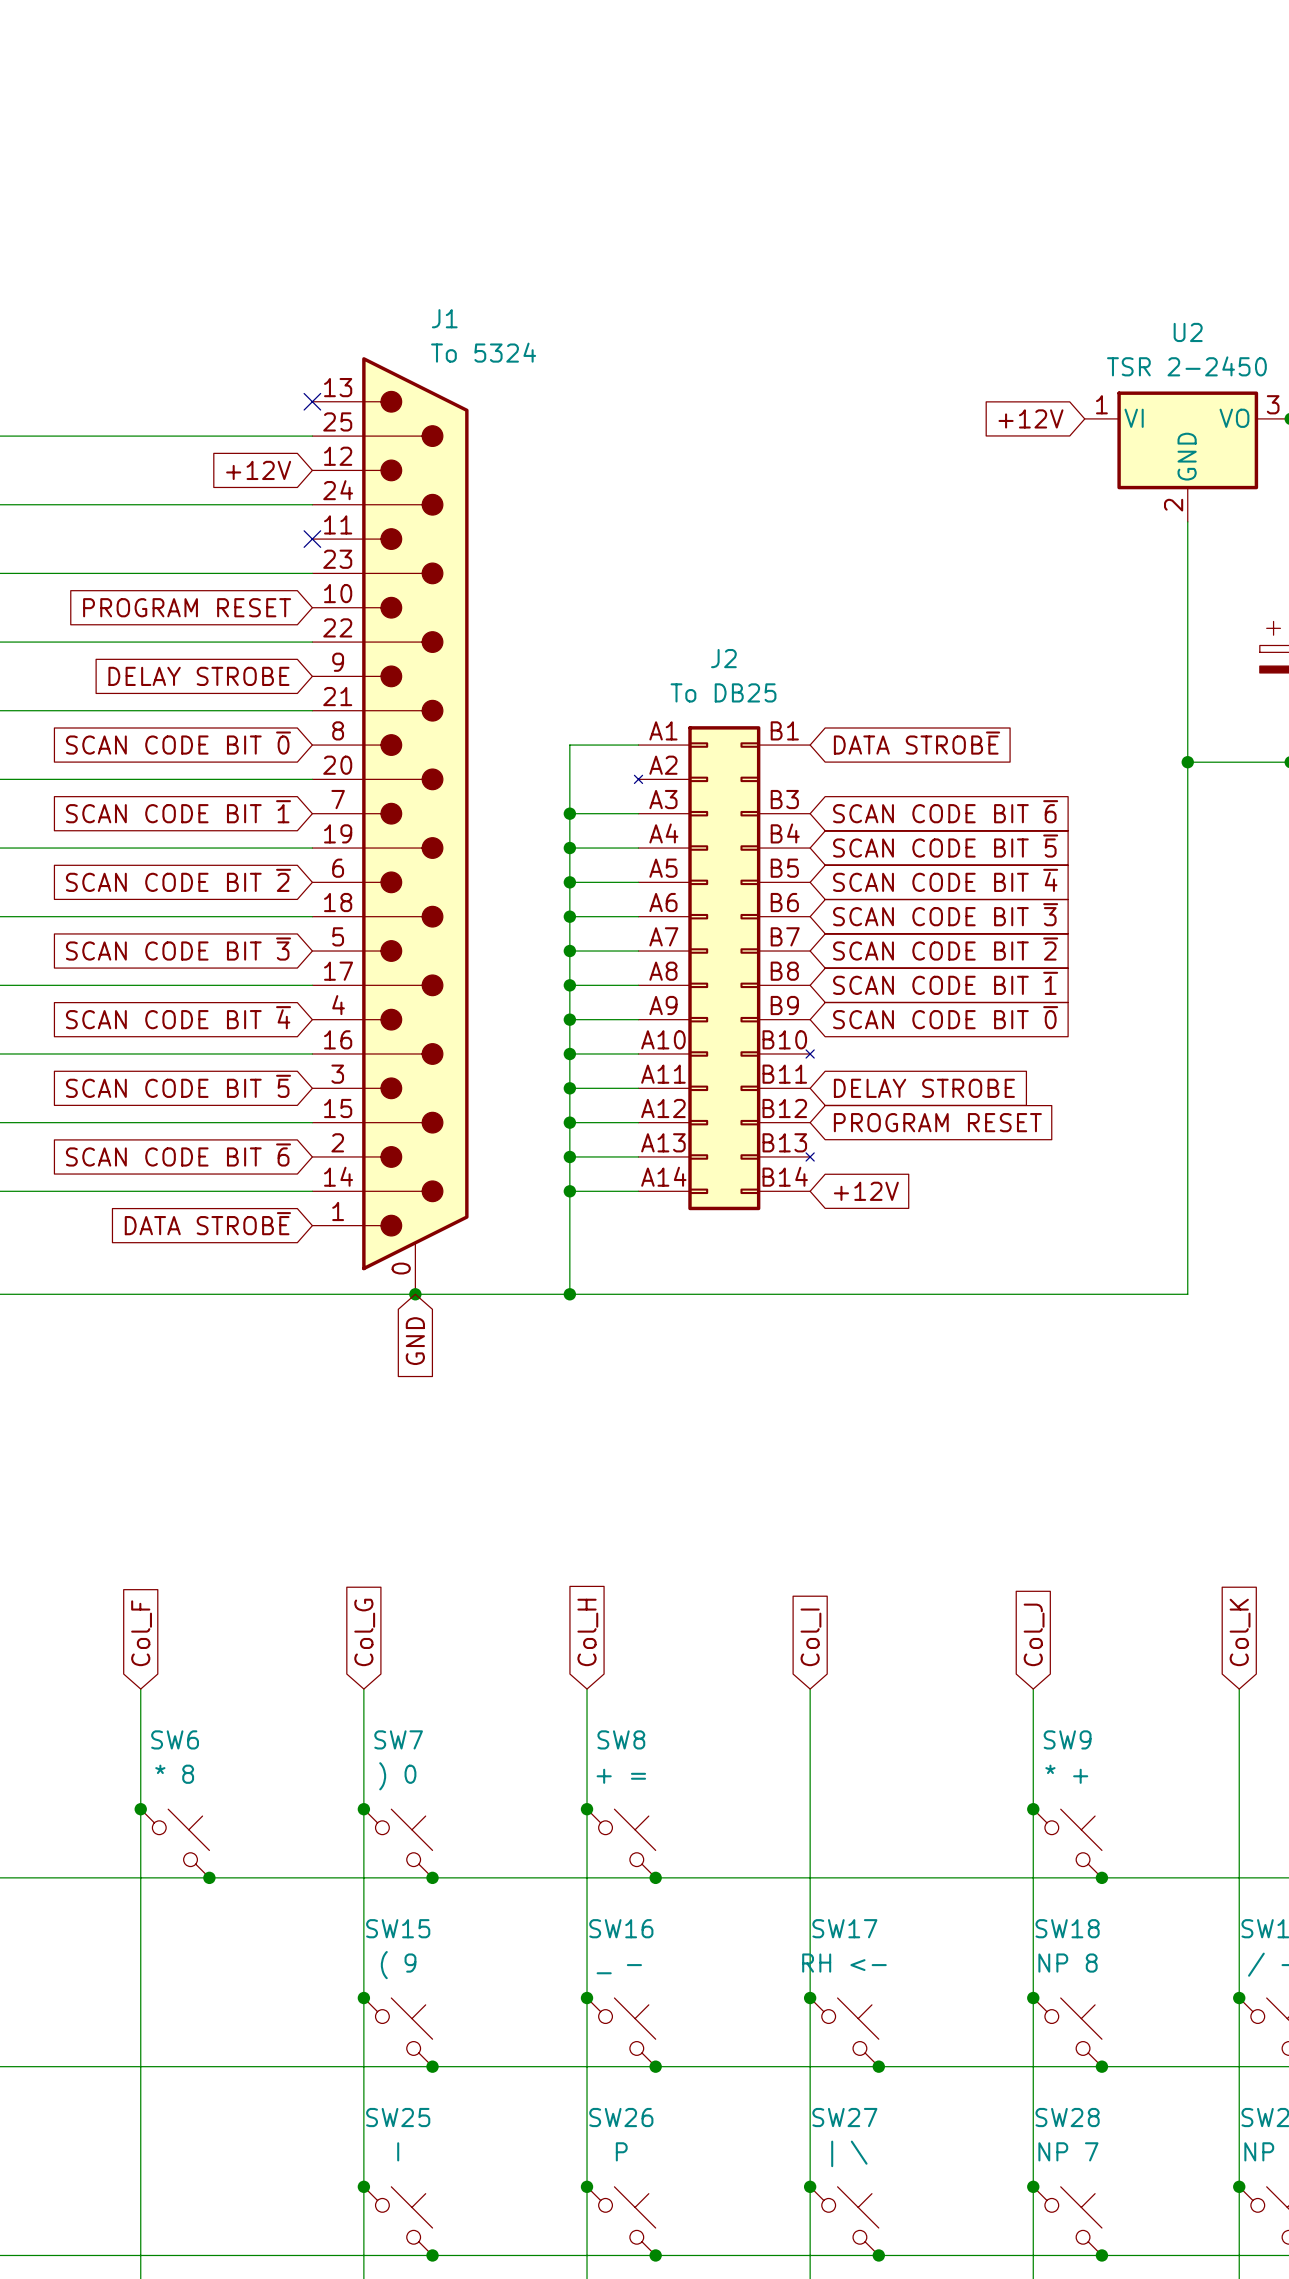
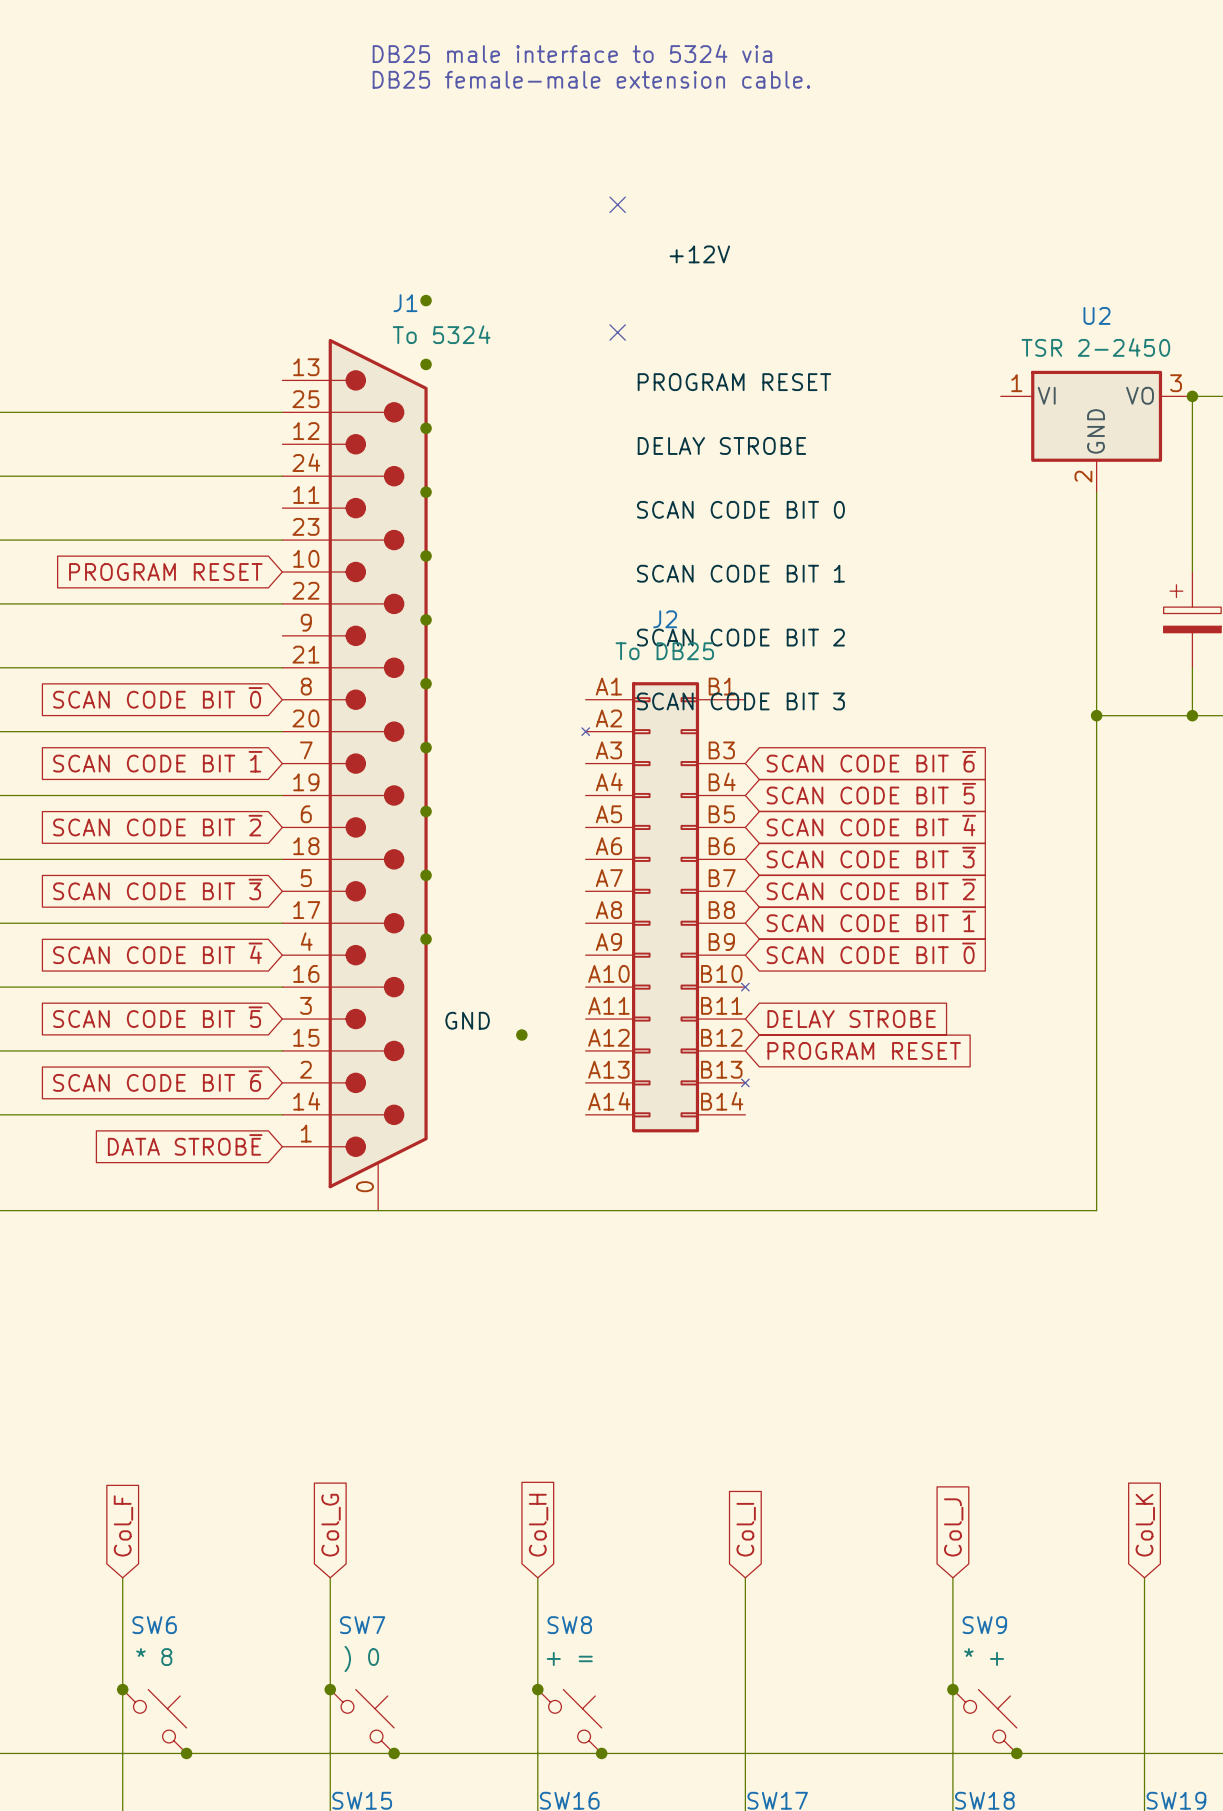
text: none -> DB25 male interface to 5324 via (572, 53)
text: none -> DB25 female-male extension cable. (591, 79)
no-connect mark: none -> (617, 204)
label: none -> +12V (699, 254)
junction: none -> (426, 300)
no-connect mark: none -> (617, 332)
junction: none -> (426, 364)
no-connect mark: (312, 401) -> none
label: none -> PROGRAM RESET (734, 382)
global label: +12V (1031, 418) -> none
junction: none -> (426, 428)
global label: +12V (258, 470) -> none
label: none -> DELAY STROBE (721, 445)
junction: none -> (426, 492)
no-connect mark: (312, 539) -> none
label: none -> SCAN CODE BIT 0 (740, 509)
junction: none -> (426, 556)
label: none -> SCAN CODE BIT 1 (740, 573)
junction: none -> (426, 619)
global label: DELAY STROBE (198, 676) -> none
label: none -> SCAN CODE BIT 2 (740, 637)
junction: none -> (426, 683)
global label: DATA STROB~{E} (916, 743) -> none
wire: (638, 745) (569, 745) (569, 1294) -> none
label: none -> SCAN CODE BIT 3 (740, 701)
junction: none -> (426, 747)
wire: (569, 813) (638, 813) -> none
junction: (569, 813) -> none
wire: (569, 848) (638, 848) -> none
junction: (569, 848) -> none
junction: none -> (426, 811)
wire: (569, 882) (638, 882) -> none
junction: (569, 882) -> none
wire: (569, 916) (638, 916) -> none
junction: (569, 916) -> none
junction: none -> (426, 875)
wire: (569, 951) (638, 951) -> none
junction: (569, 951) -> none
wire: (569, 985) (638, 985) -> none
junction: (569, 985) -> none
junction: none -> (426, 939)
wire: (569, 1019) (638, 1019) -> none
junction: (569, 1019) -> none
wire: (569, 1053) (638, 1053) -> none
junction: (569, 1053) -> none
wire: (569, 1088) (638, 1088) -> none
junction: (569, 1088) -> none
label: none -> GND (467, 1020)
junction: none -> (521, 1035)
wire: (569, 1122) (638, 1122) -> none
junction: (569, 1122) -> none
wire: (569, 1156) (638, 1156) -> none
junction: (569, 1156) -> none
wire: (569, 1191) (638, 1191) -> none
junction: (569, 1191) -> none
global label: +12V (866, 1191) -> none
junction: (415, 1294) -> none
junction: (569, 1294) -> none
global label: GND (415, 1341) -> none

